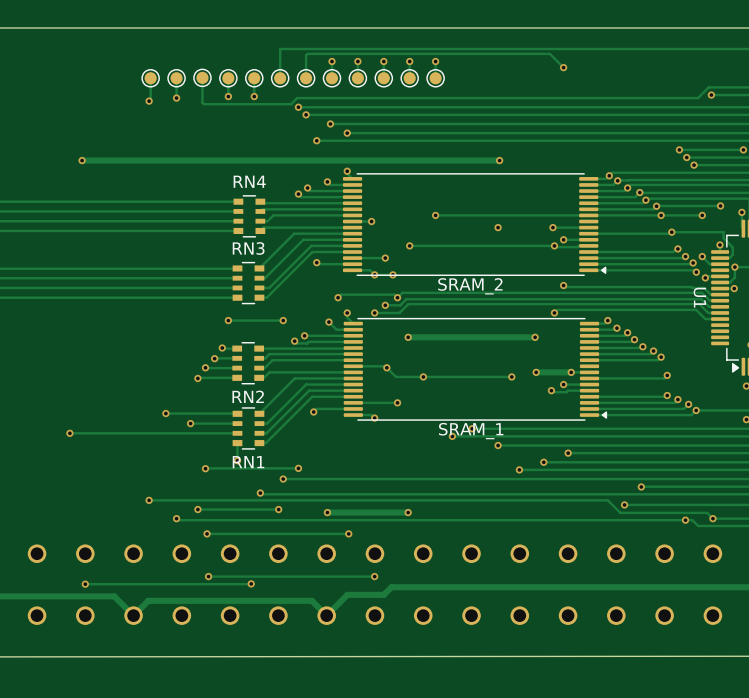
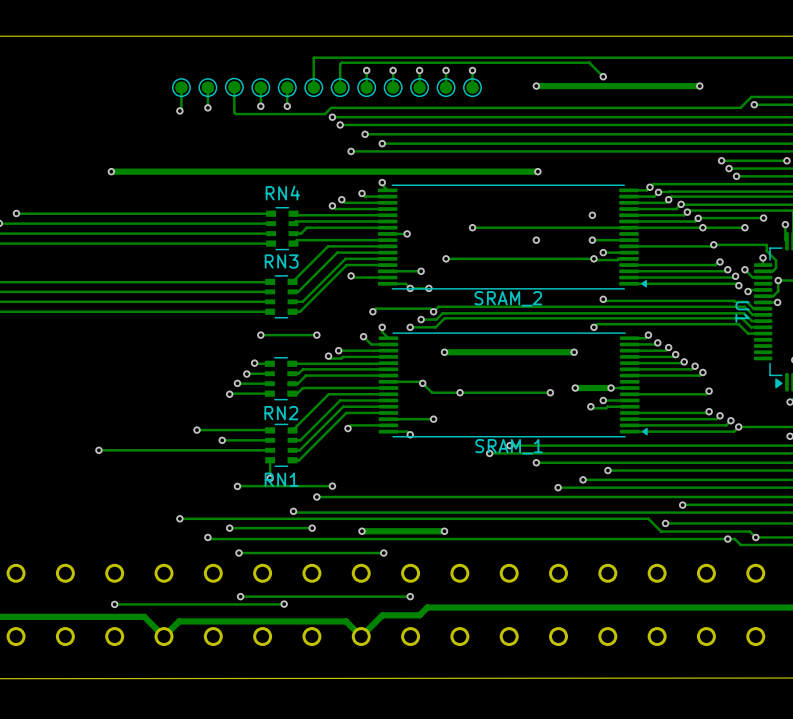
via: none -> (536, 86)
track: none -> (699, 86) (536, 86)
via: none -> (699, 86)
via: none -> (592, 215)

